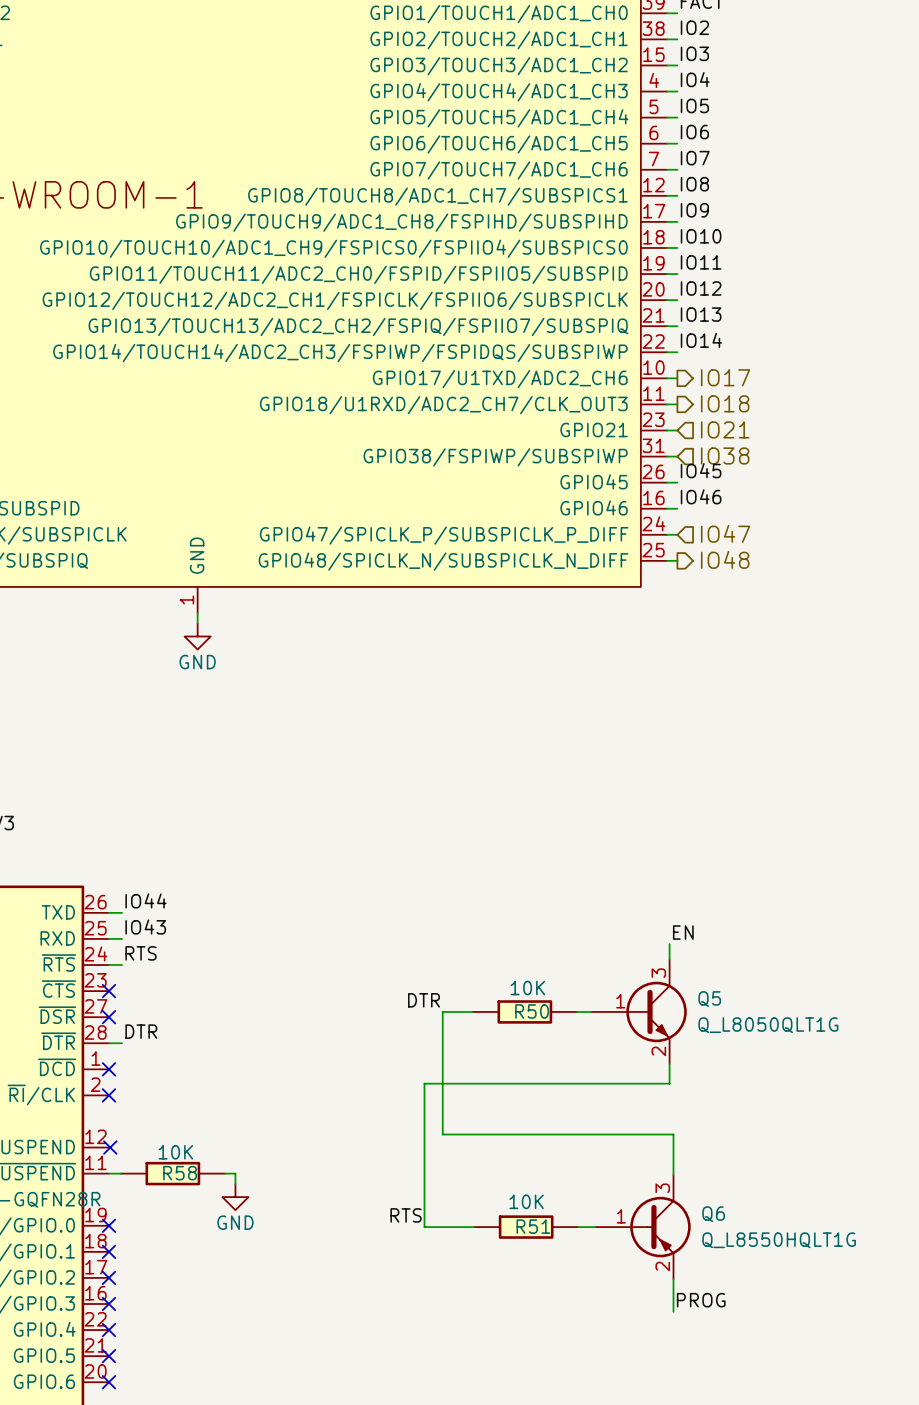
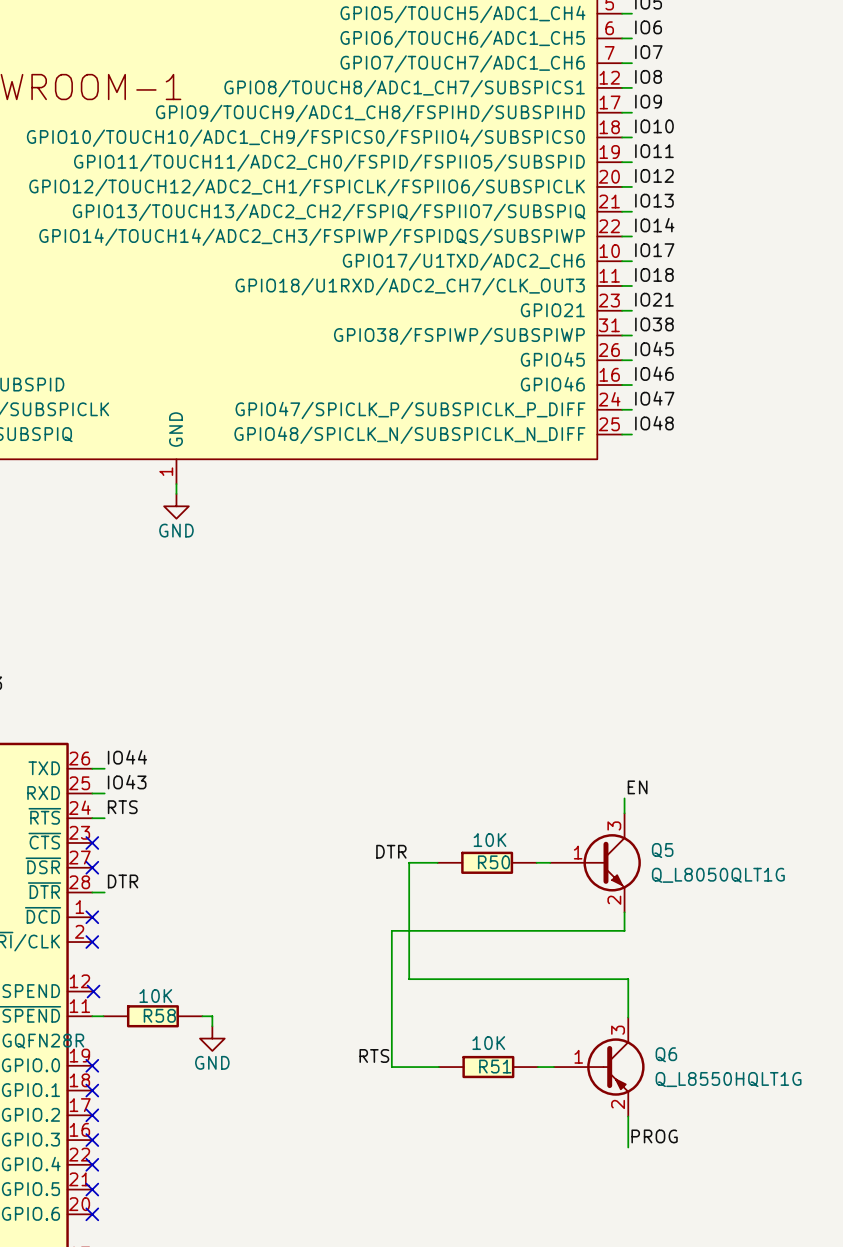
label: none -> IO17 (654, 250)
hierarchical label: IO17 (725, 377) -> none
label: none -> IO18 (654, 274)
hierarchical label: IO18 (725, 403) -> none
label: none -> IO21 (654, 299)
hierarchical label: IO21 (725, 429) -> none
label: none -> IO38 (654, 324)
hierarchical label: IO38 (725, 455) -> none
label: none -> IO47 (654, 398)
hierarchical label: IO47 (725, 533) -> none
label: none -> IO48 (654, 423)
hierarchical label: IO48 (725, 559) -> none

